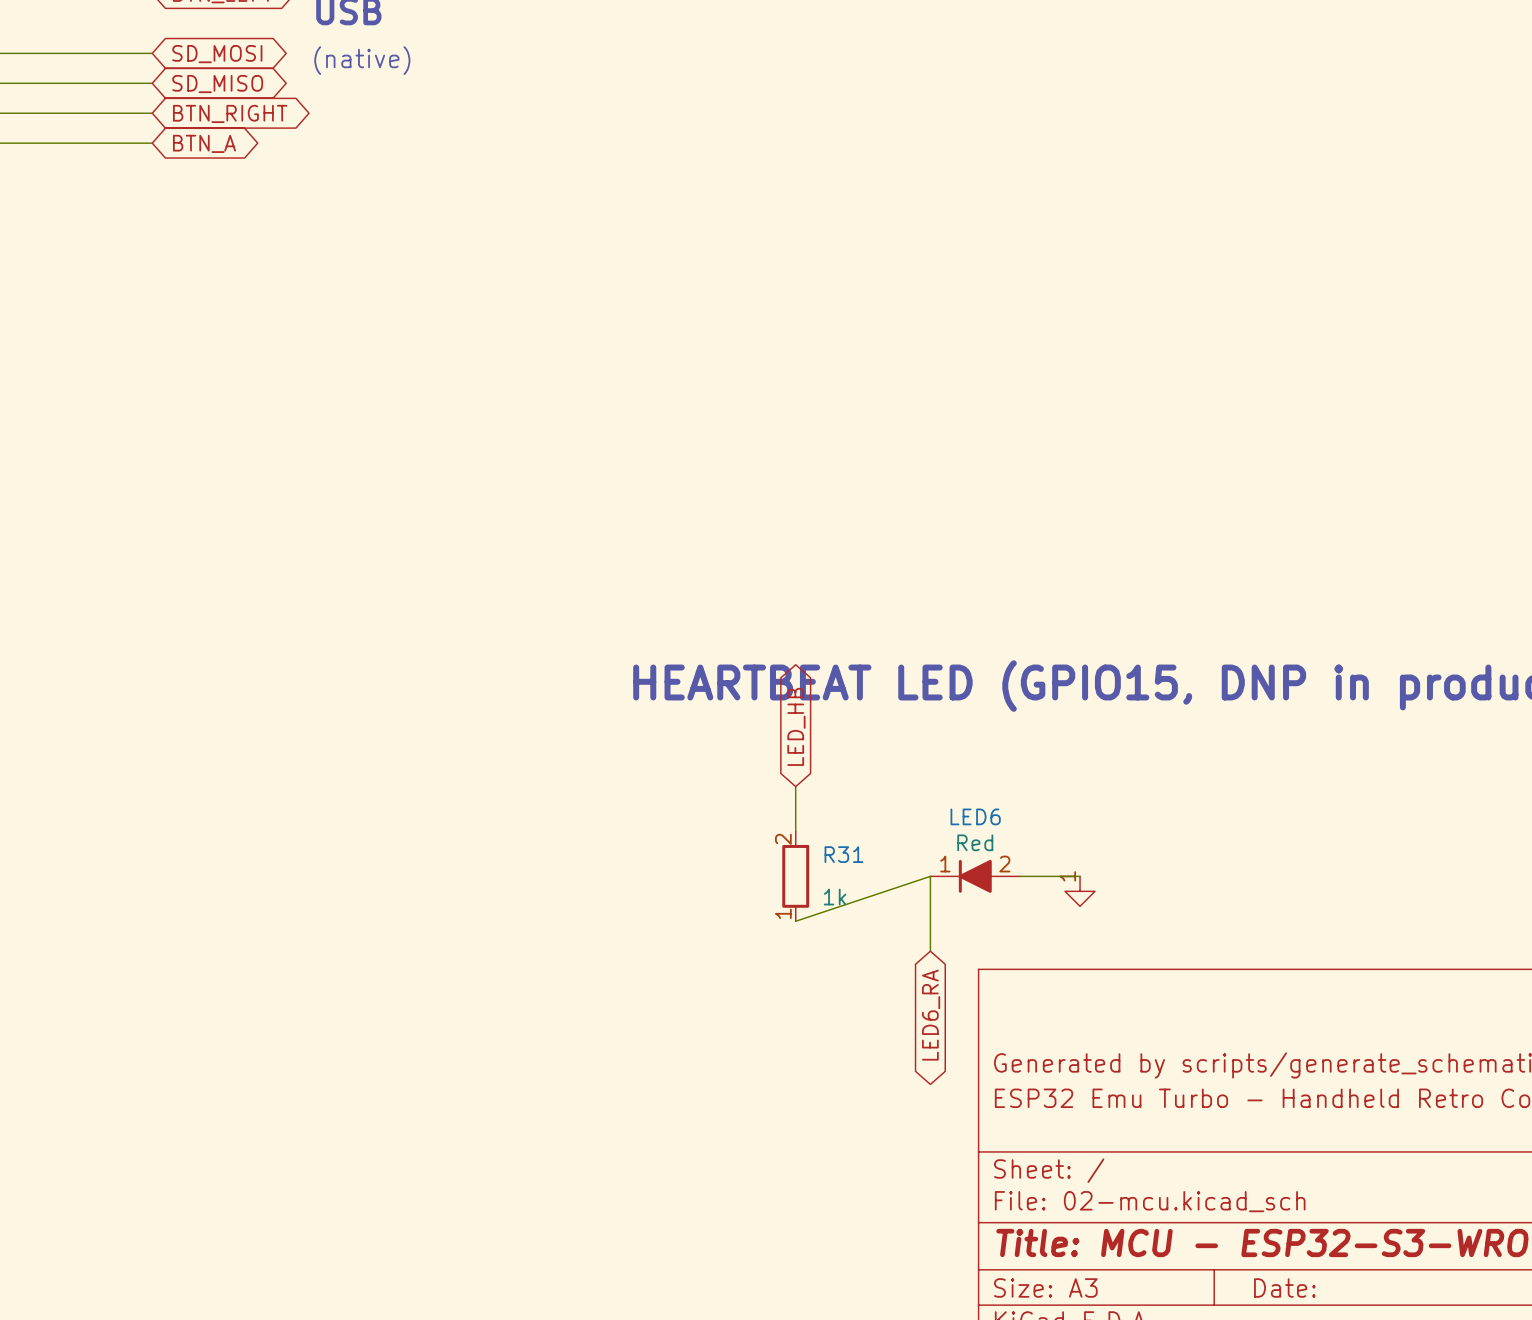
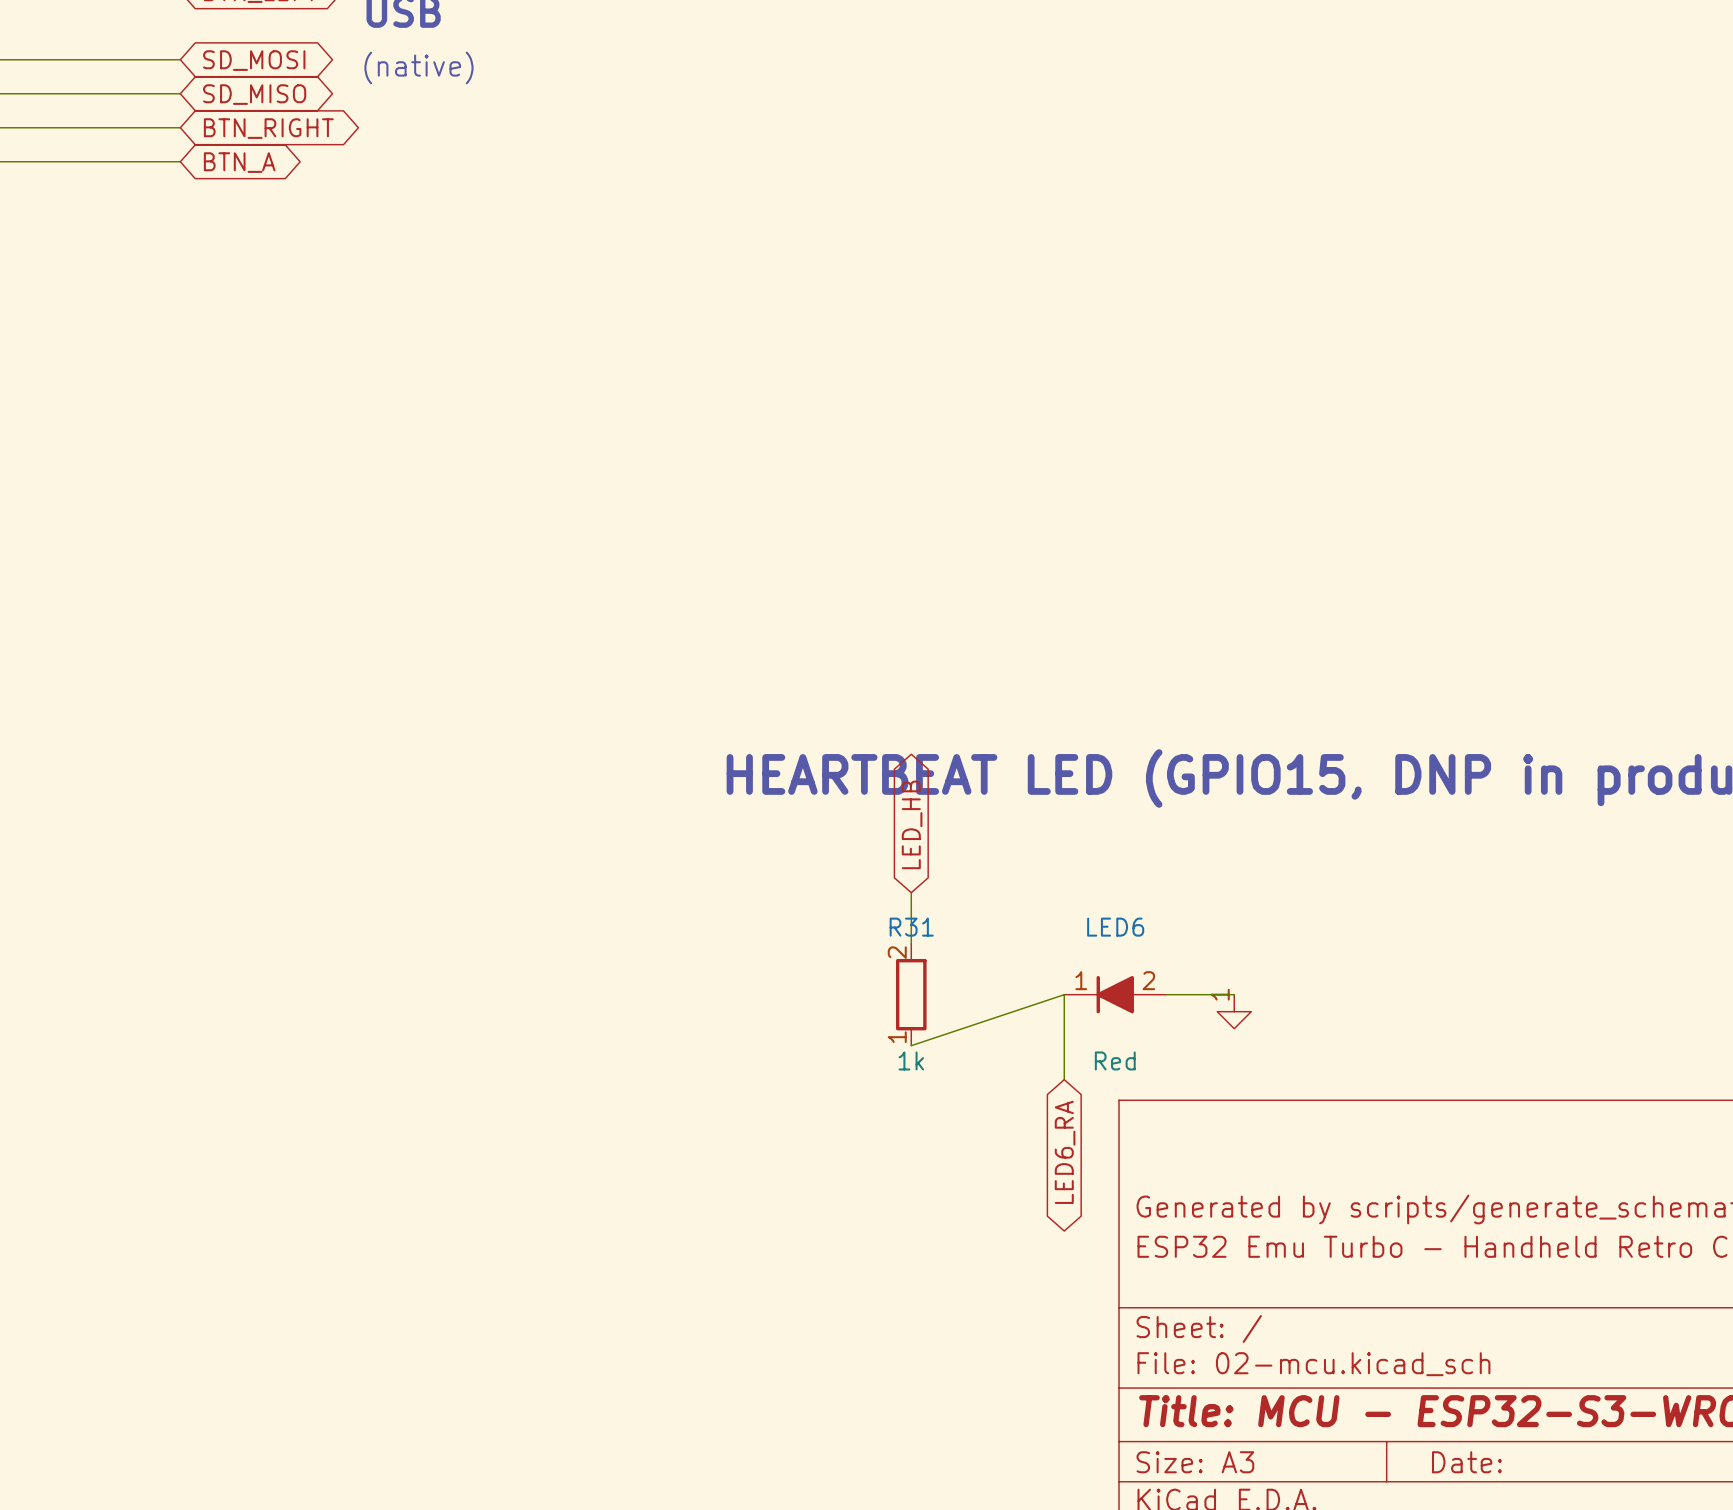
LED6 value position: Red (975, 842) -> Red (1115, 1060)
R31 name position: R31 (843, 854) -> R31 (911, 927)
R31 value position: 1k (835, 897) -> 1k (911, 1060)

